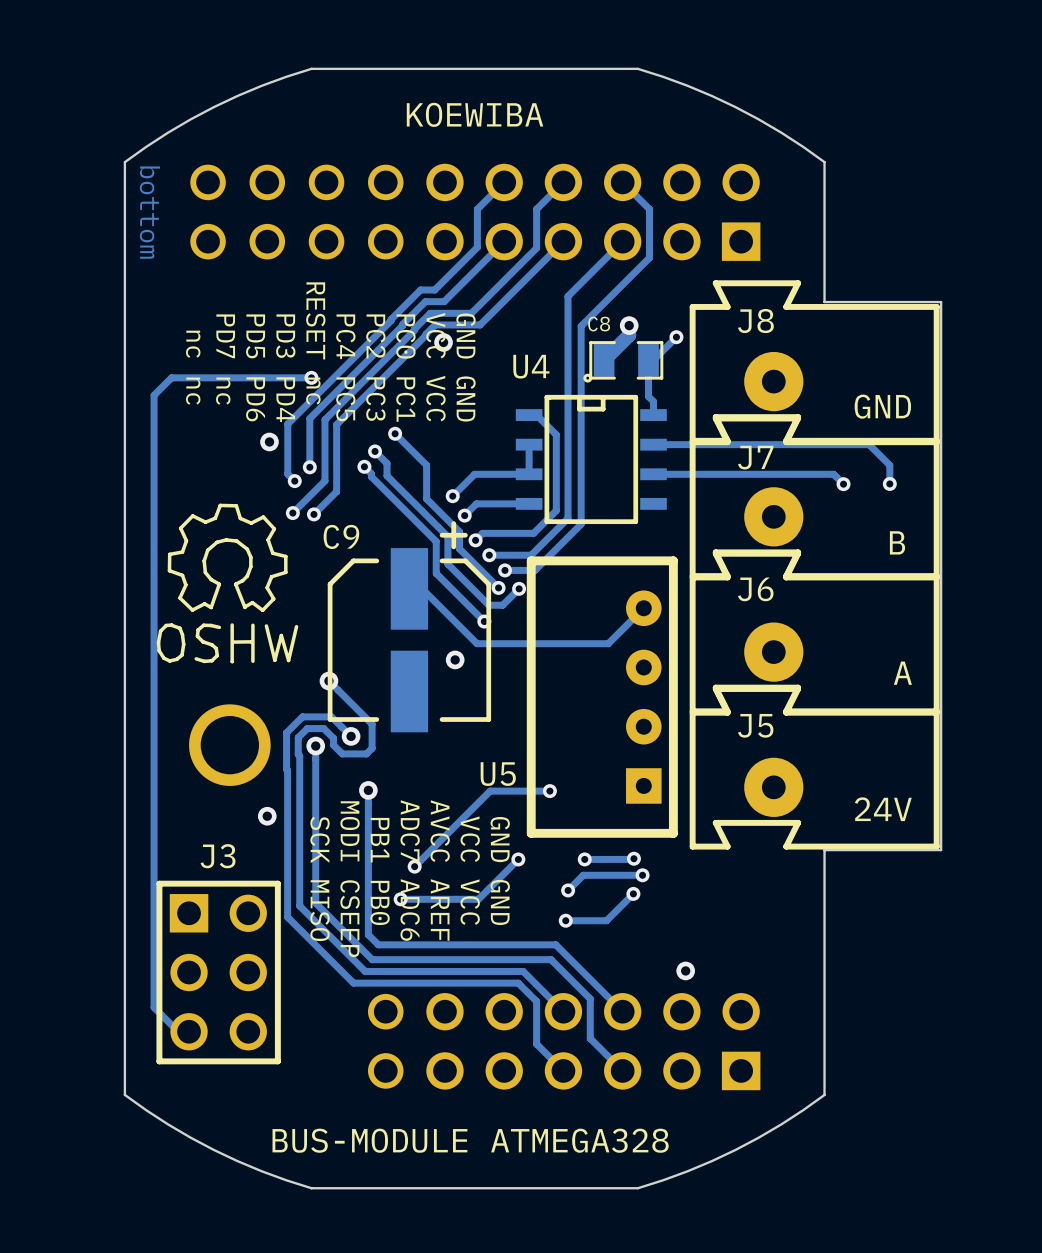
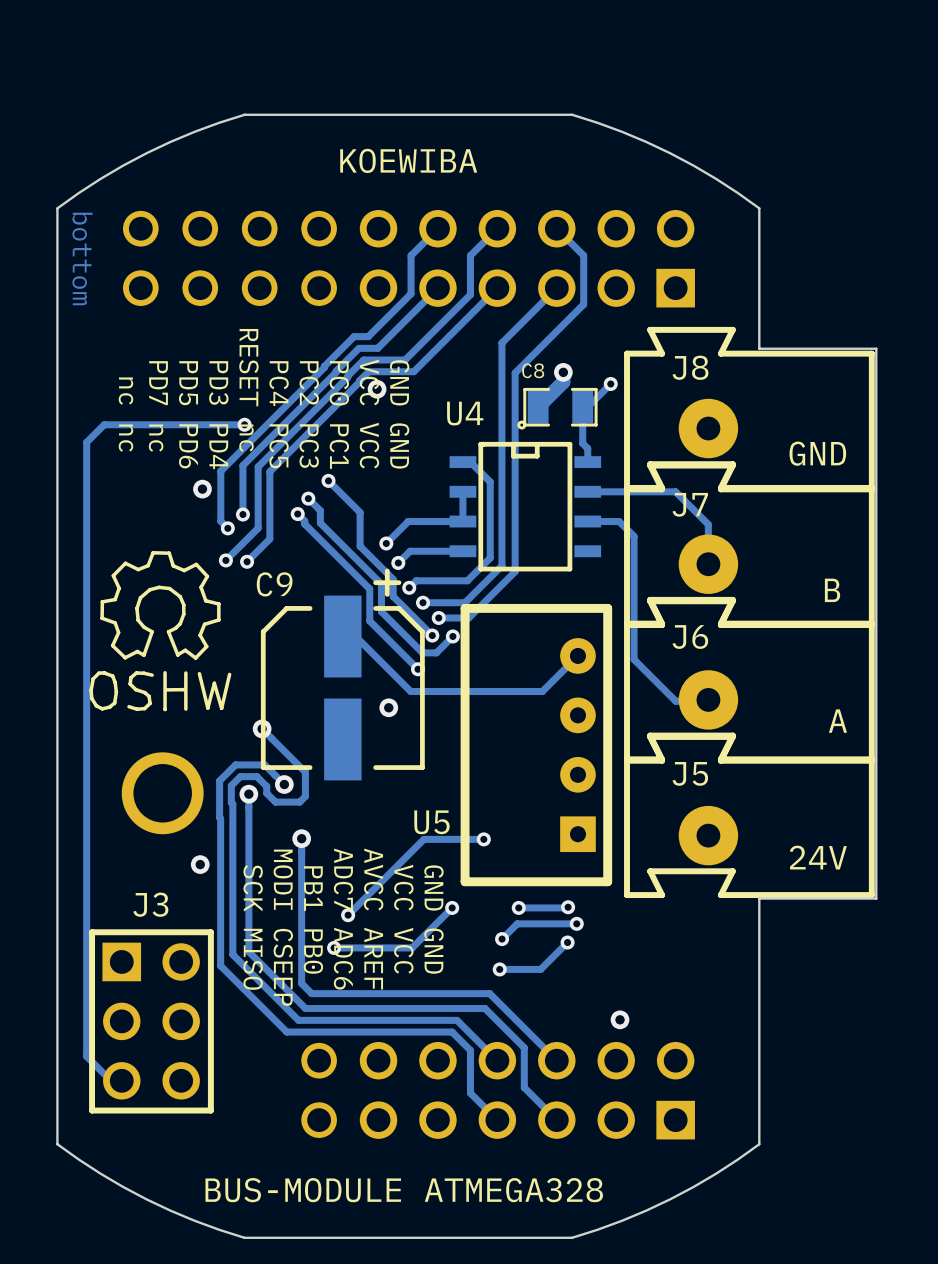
track: (741, 444) (869, 444) (889, 465) (889, 483) -> (675, 491) (708, 524) (708, 564)
track: (684, 474) (833, 474) (843, 484) -> (619, 521) (634, 536) (634, 659) (675, 701) (708, 699)
via: (889, 483) -> none
via: (843, 484) -> none

